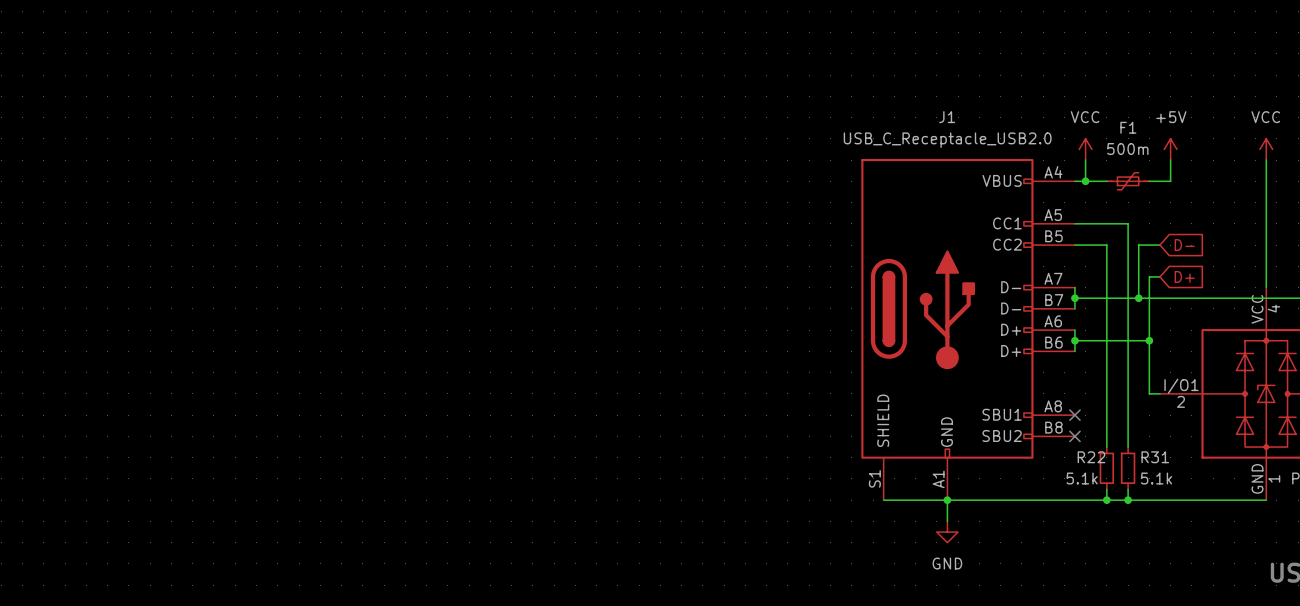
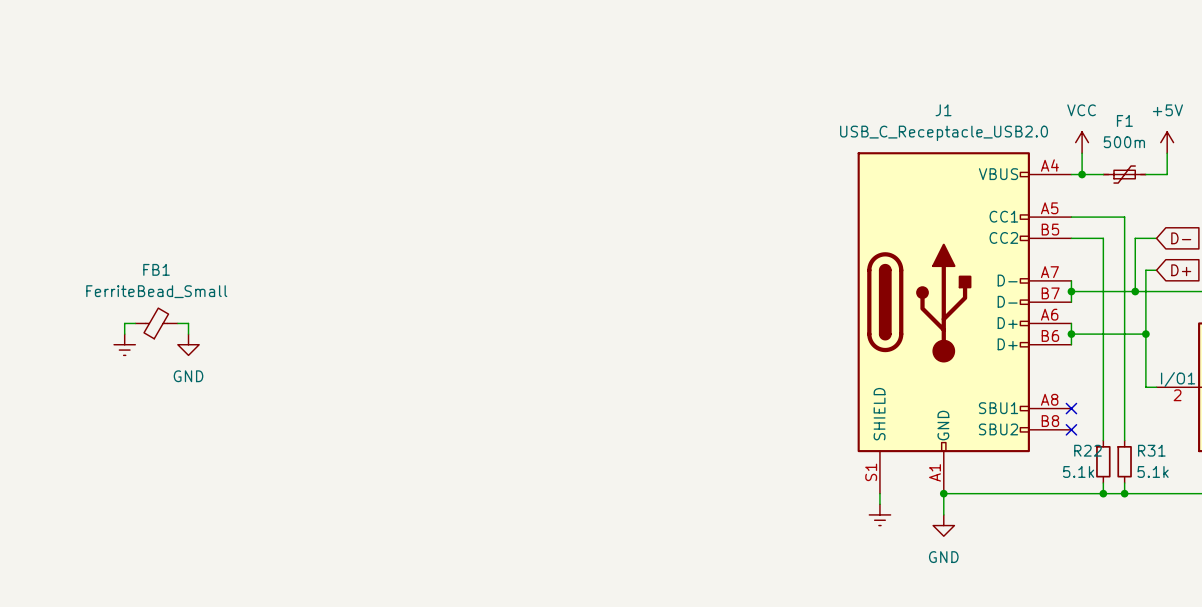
wire: none -> (135, 323) (124, 323) (124, 334)
FB1: none -> FerriteBead_Small (156, 323)
wire: none -> (177, 323) (188, 323) (188, 334)
power symbol: none -> (124, 344)
power symbol: none -> GND (188, 344)
wire: (883, 500) (947, 500) -> (879, 493) (879, 504)
power symbol: none -> (879, 514)

